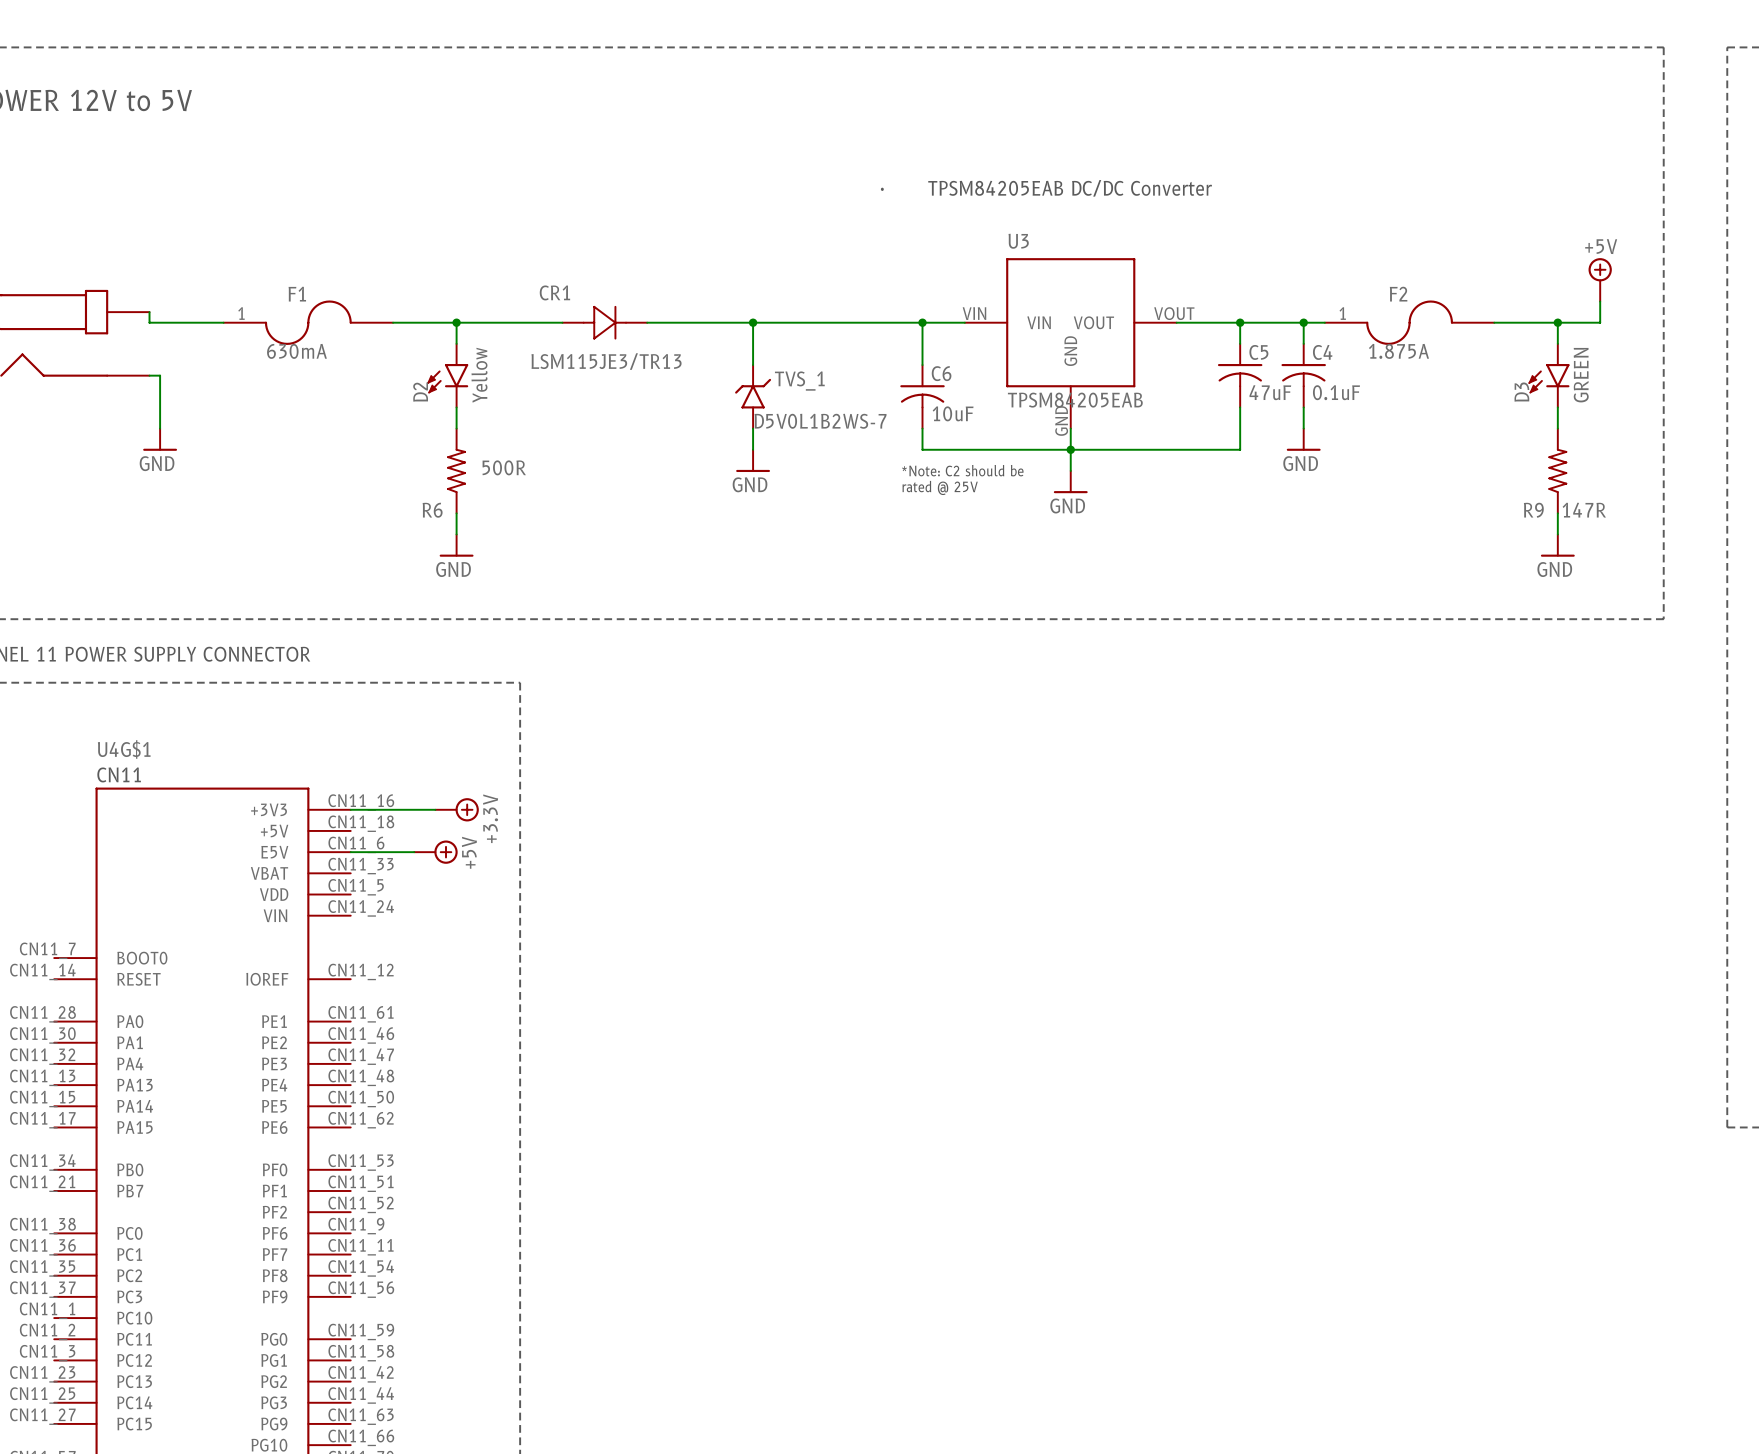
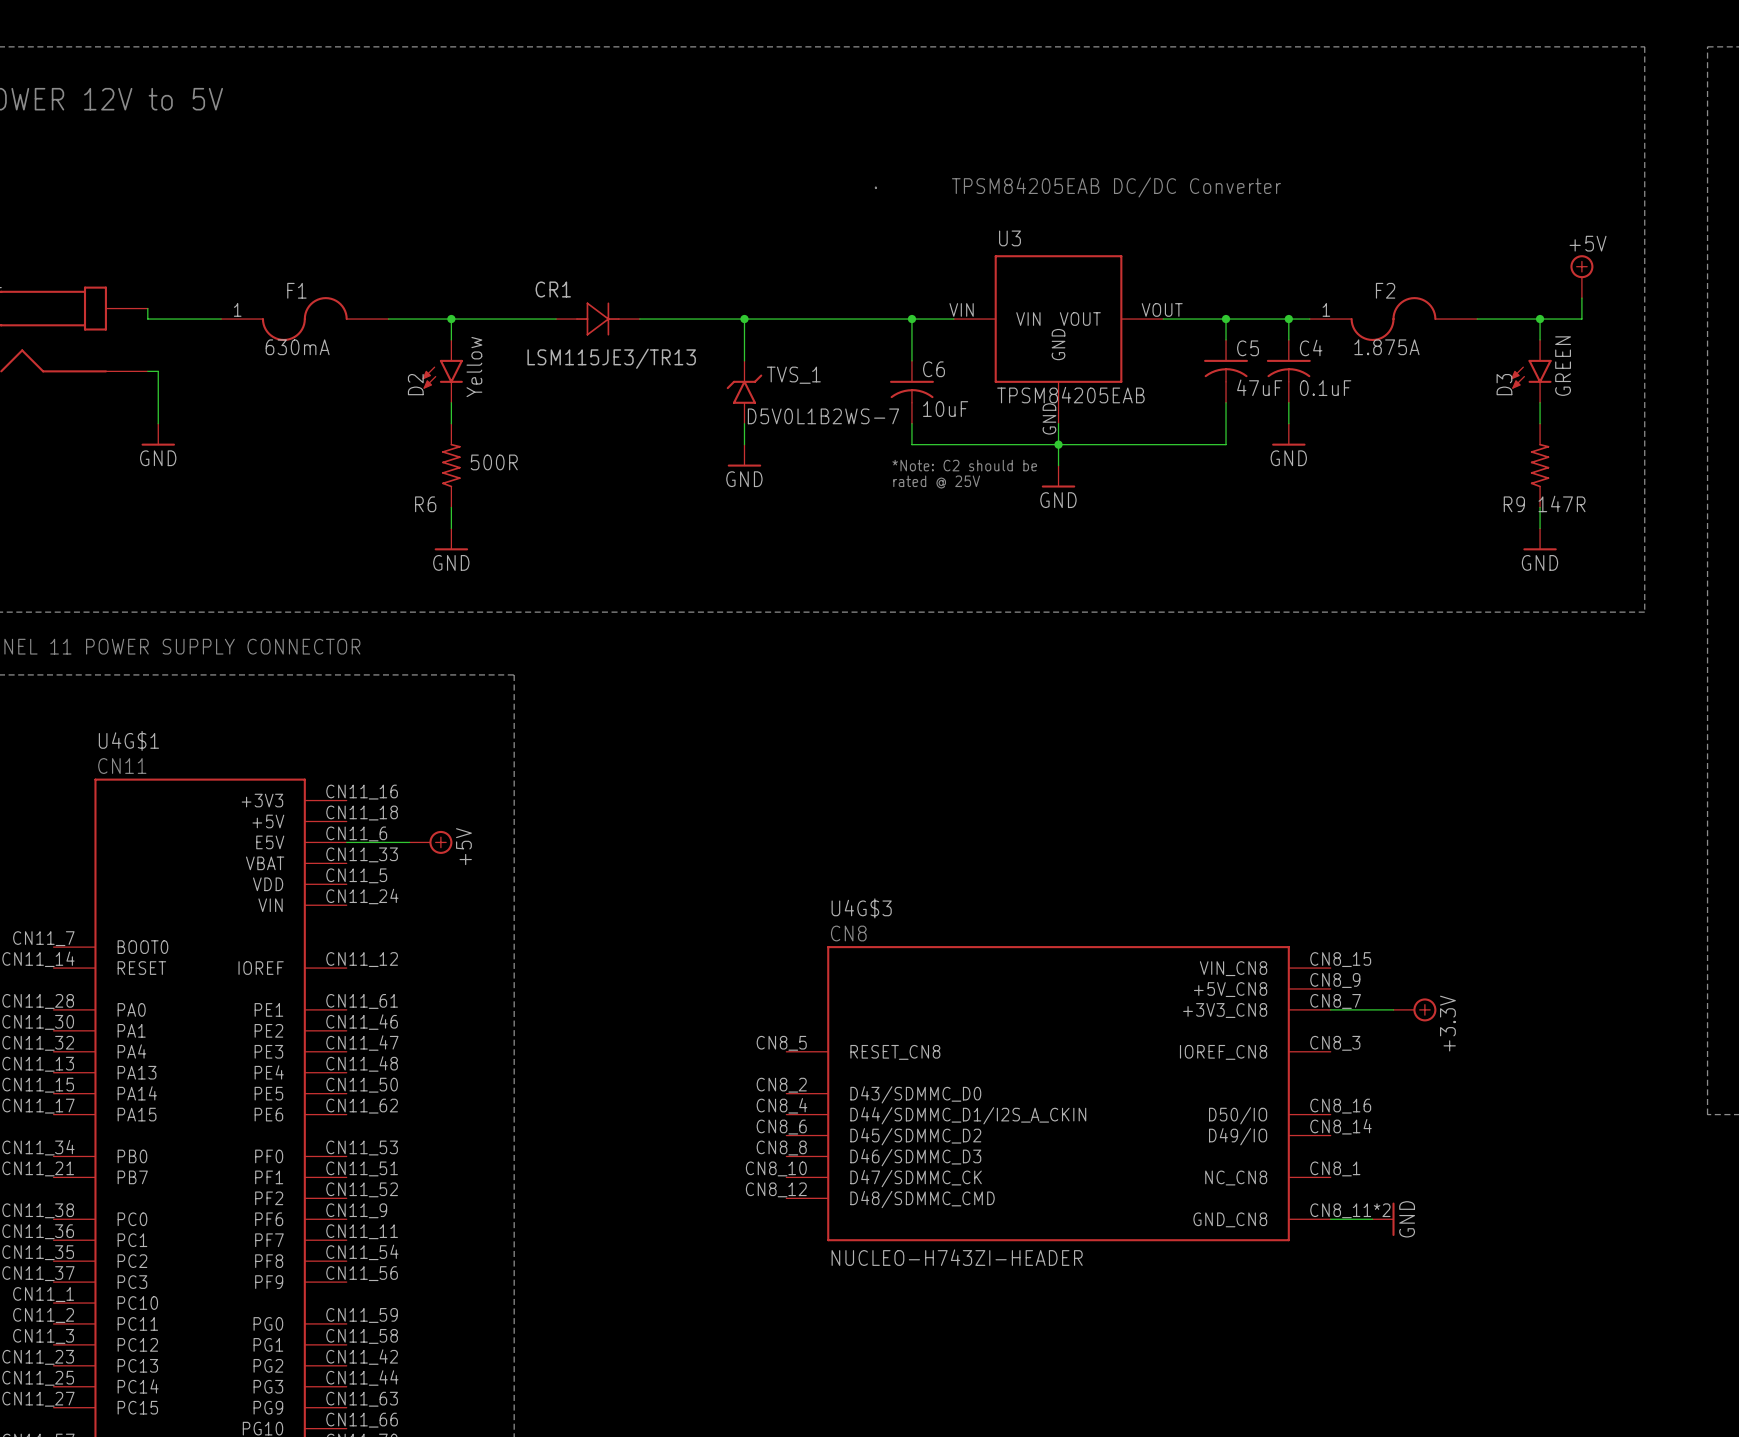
wire: (350, 809) (435, 809) -> none
power symbol: +3.3V (457, 809) -> none
wire: none -> (1330, 1009) (1393, 1009)
power symbol: none -> +3.3V (1414, 1009)
U4G$3: none -> NUCLEO-H743ZI-HEADER (1058, 1093)
wire: none -> (1330, 1219) (1372, 1219)
power symbol: none -> GND (1383, 1219)

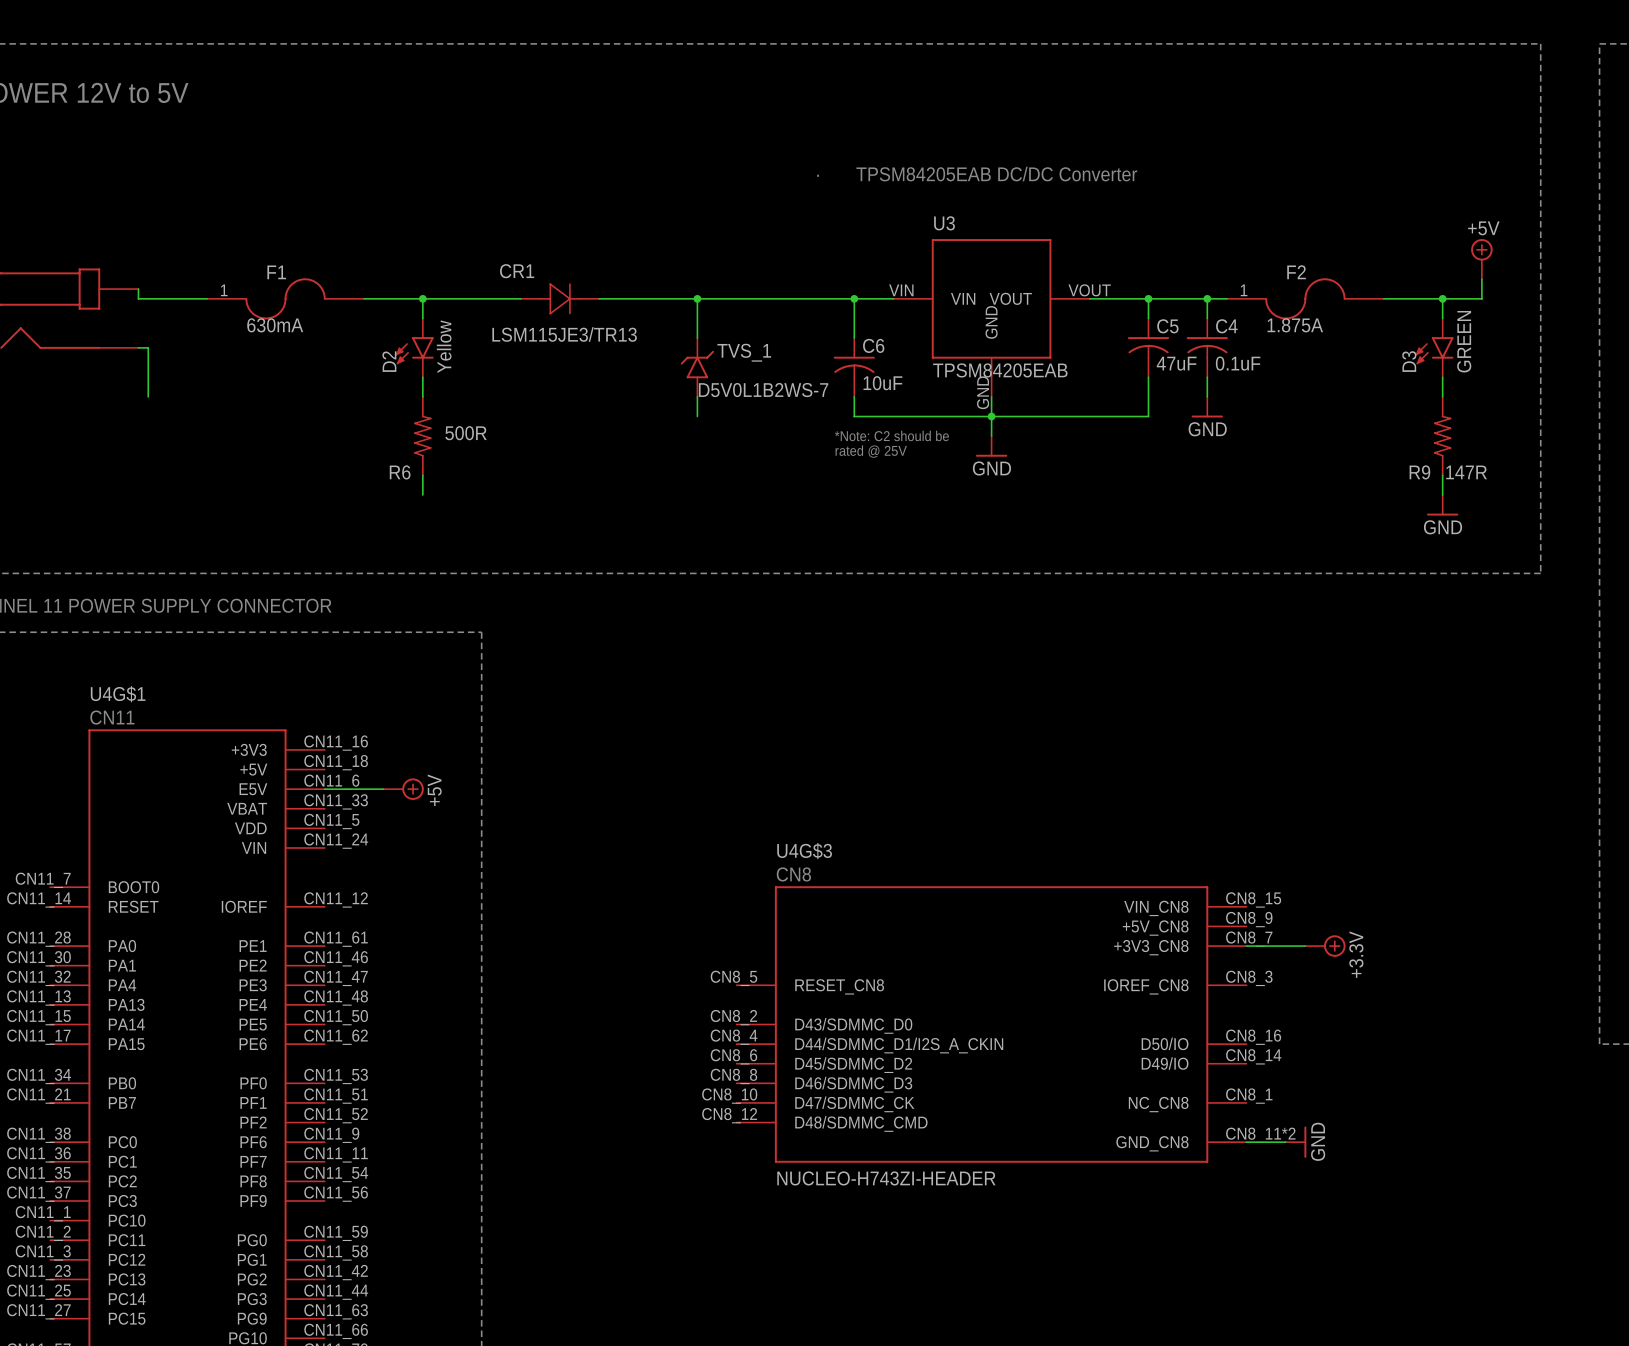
power symbol: GND (158, 434) -> none
power symbol: GND (744, 455) -> none
power symbol: GND (451, 539) -> none

